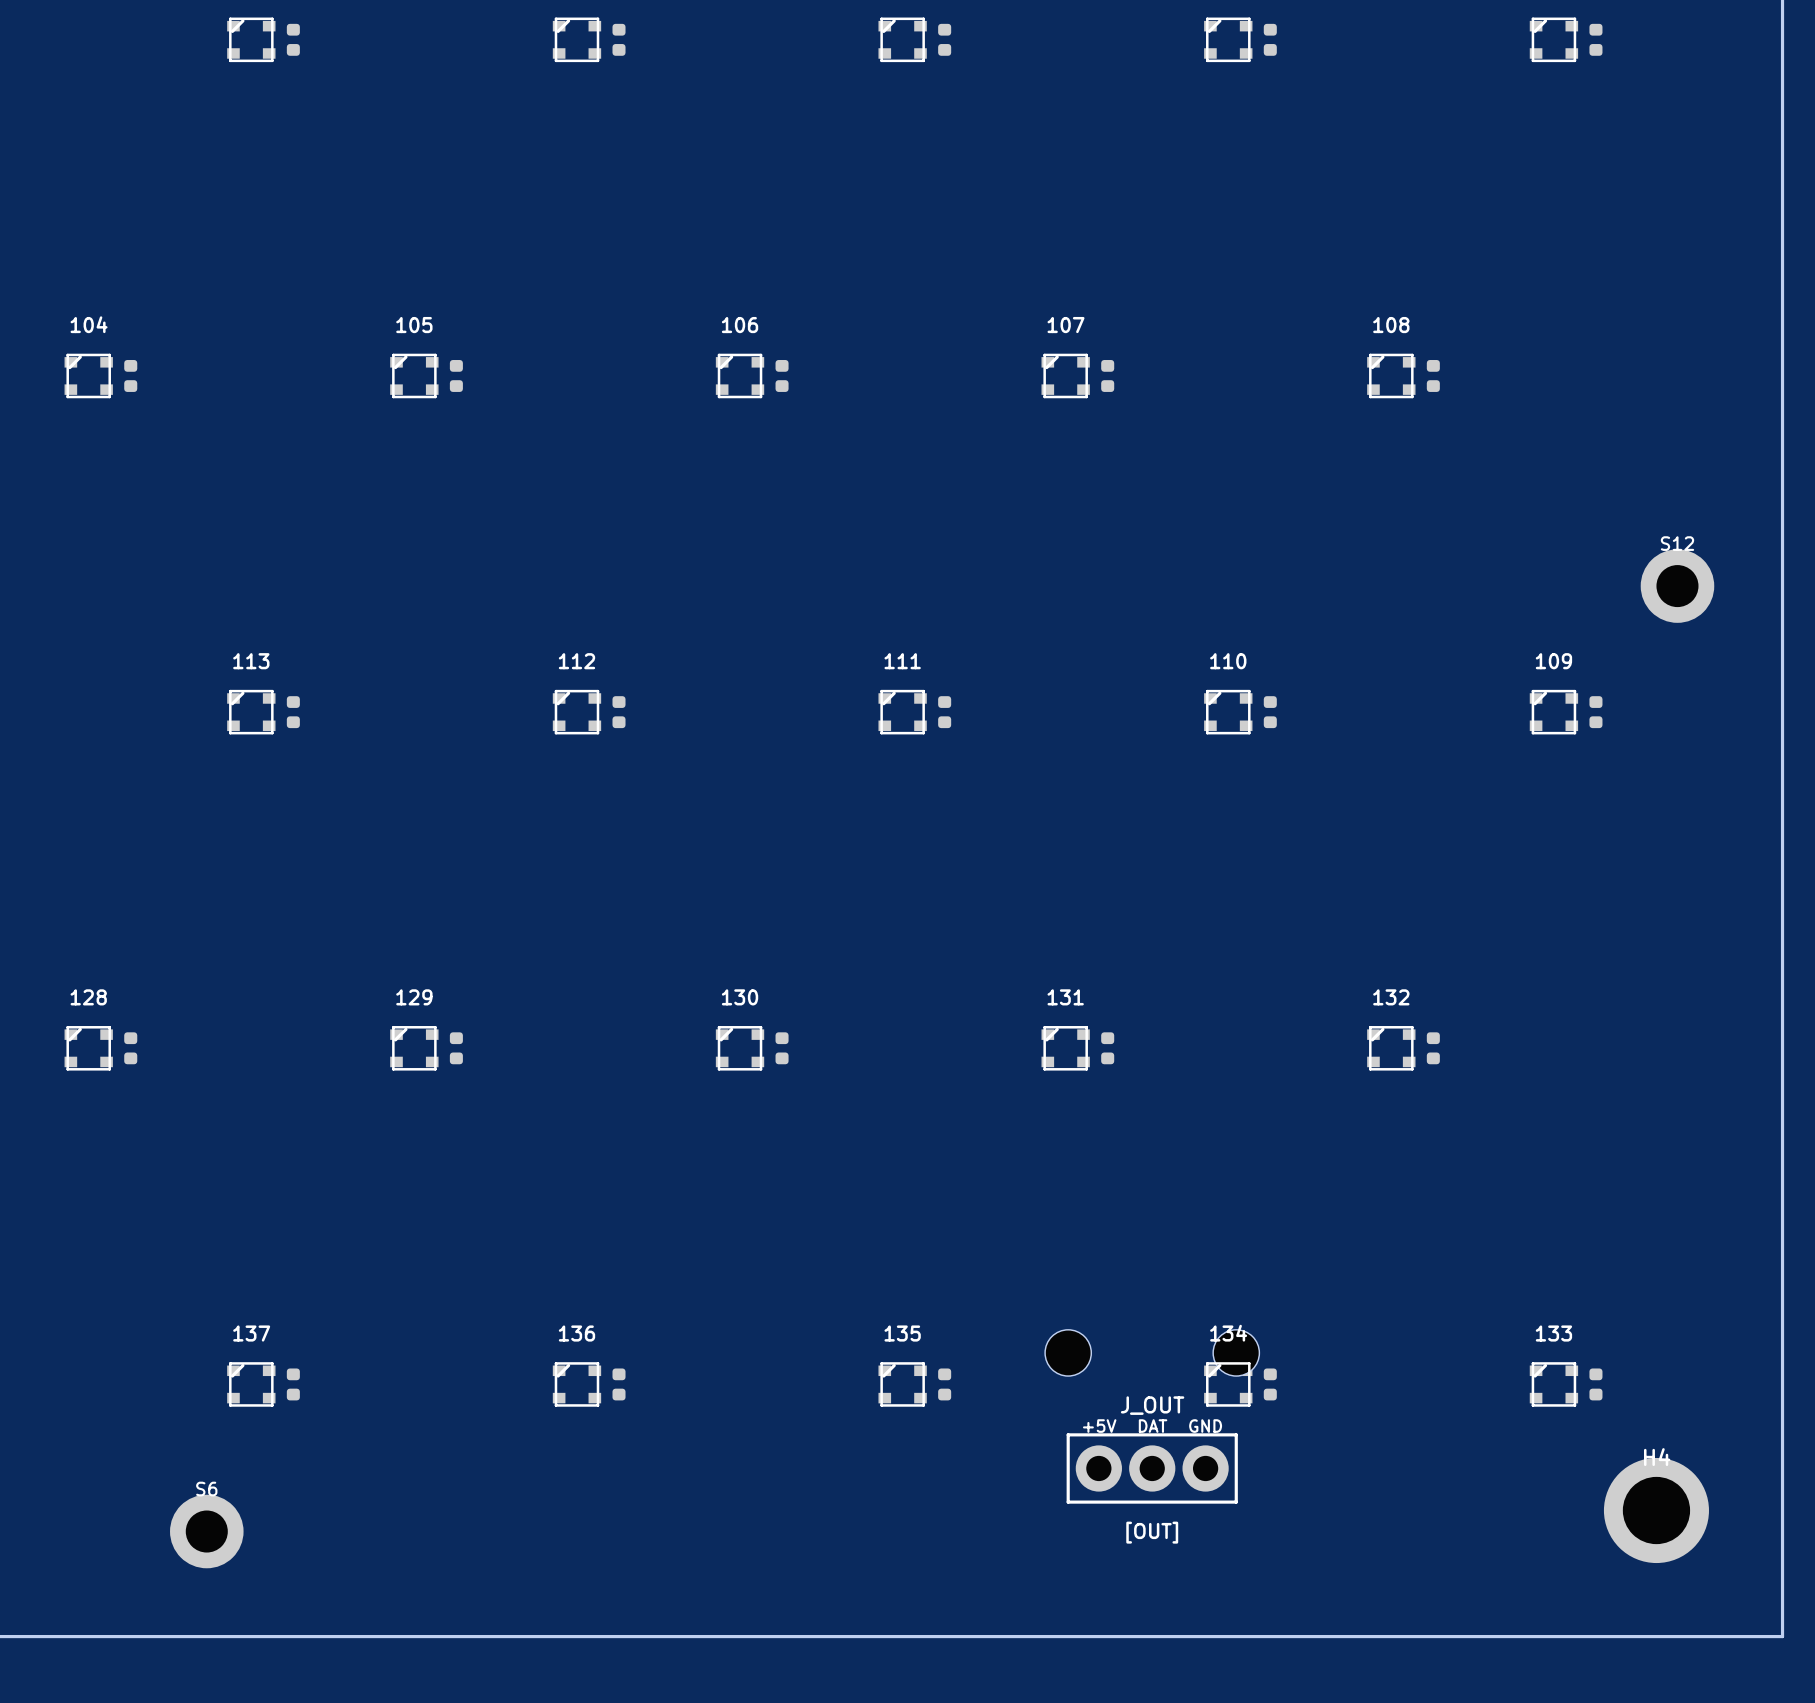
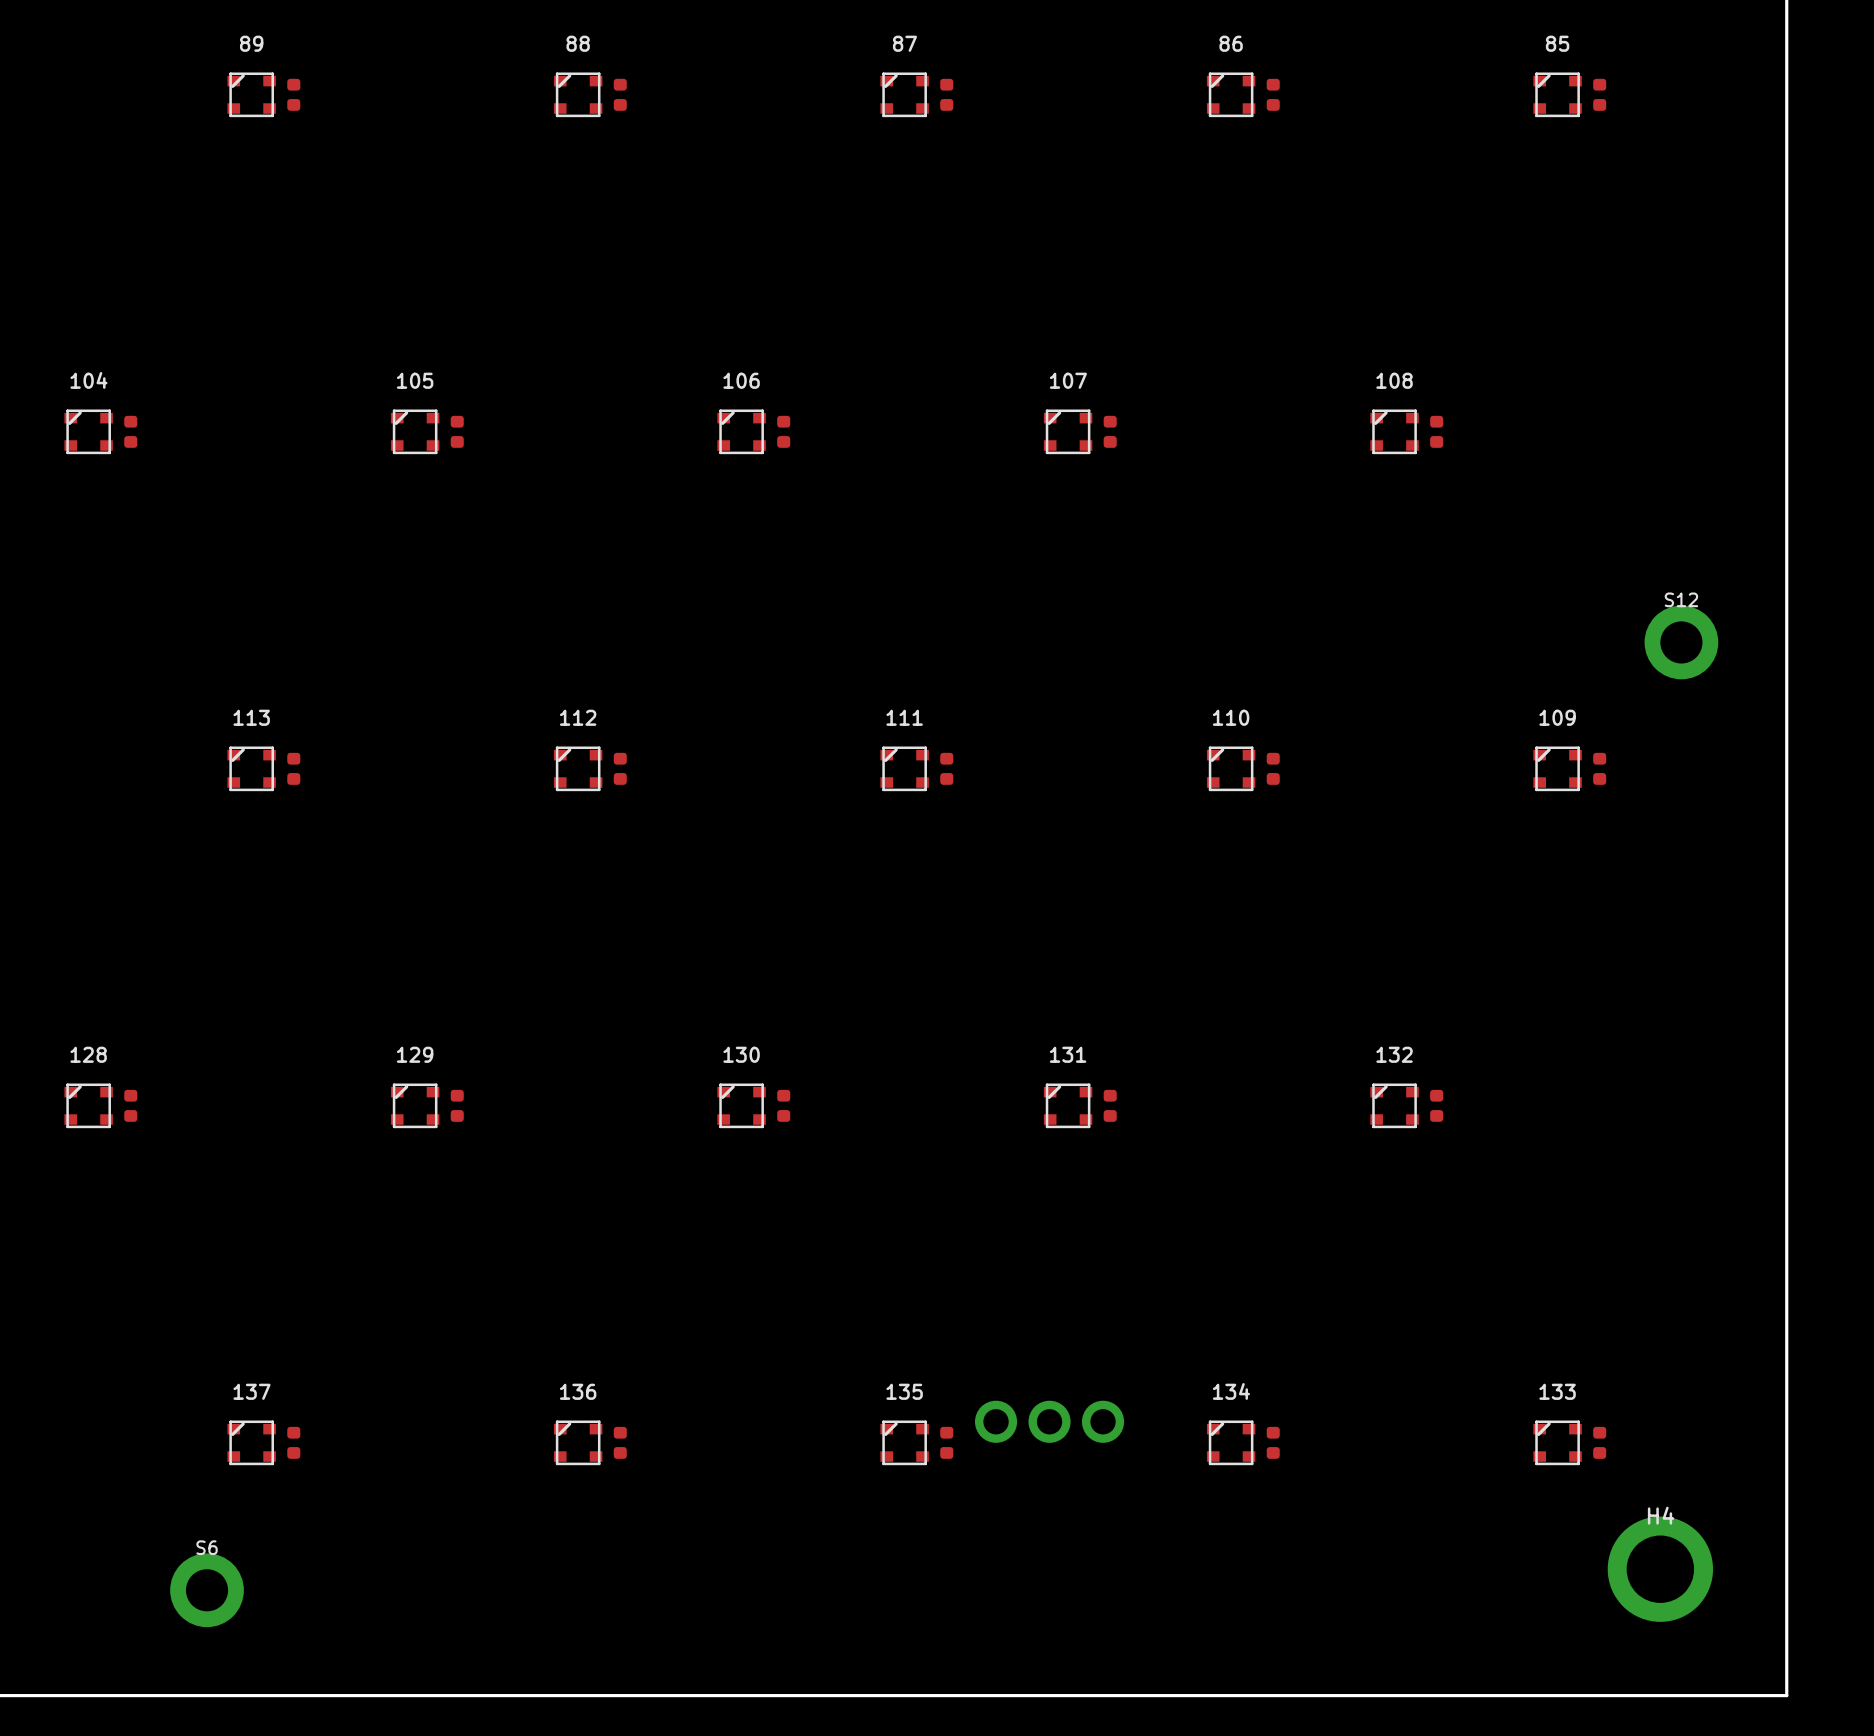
part: (1068, 1352) -> none
part: (1236, 1352) -> none
part: none -> (996, 1421)
part: none -> (1049, 1421)
part: none -> (1103, 1421)
J_OUT: (1152, 1468) -> none

